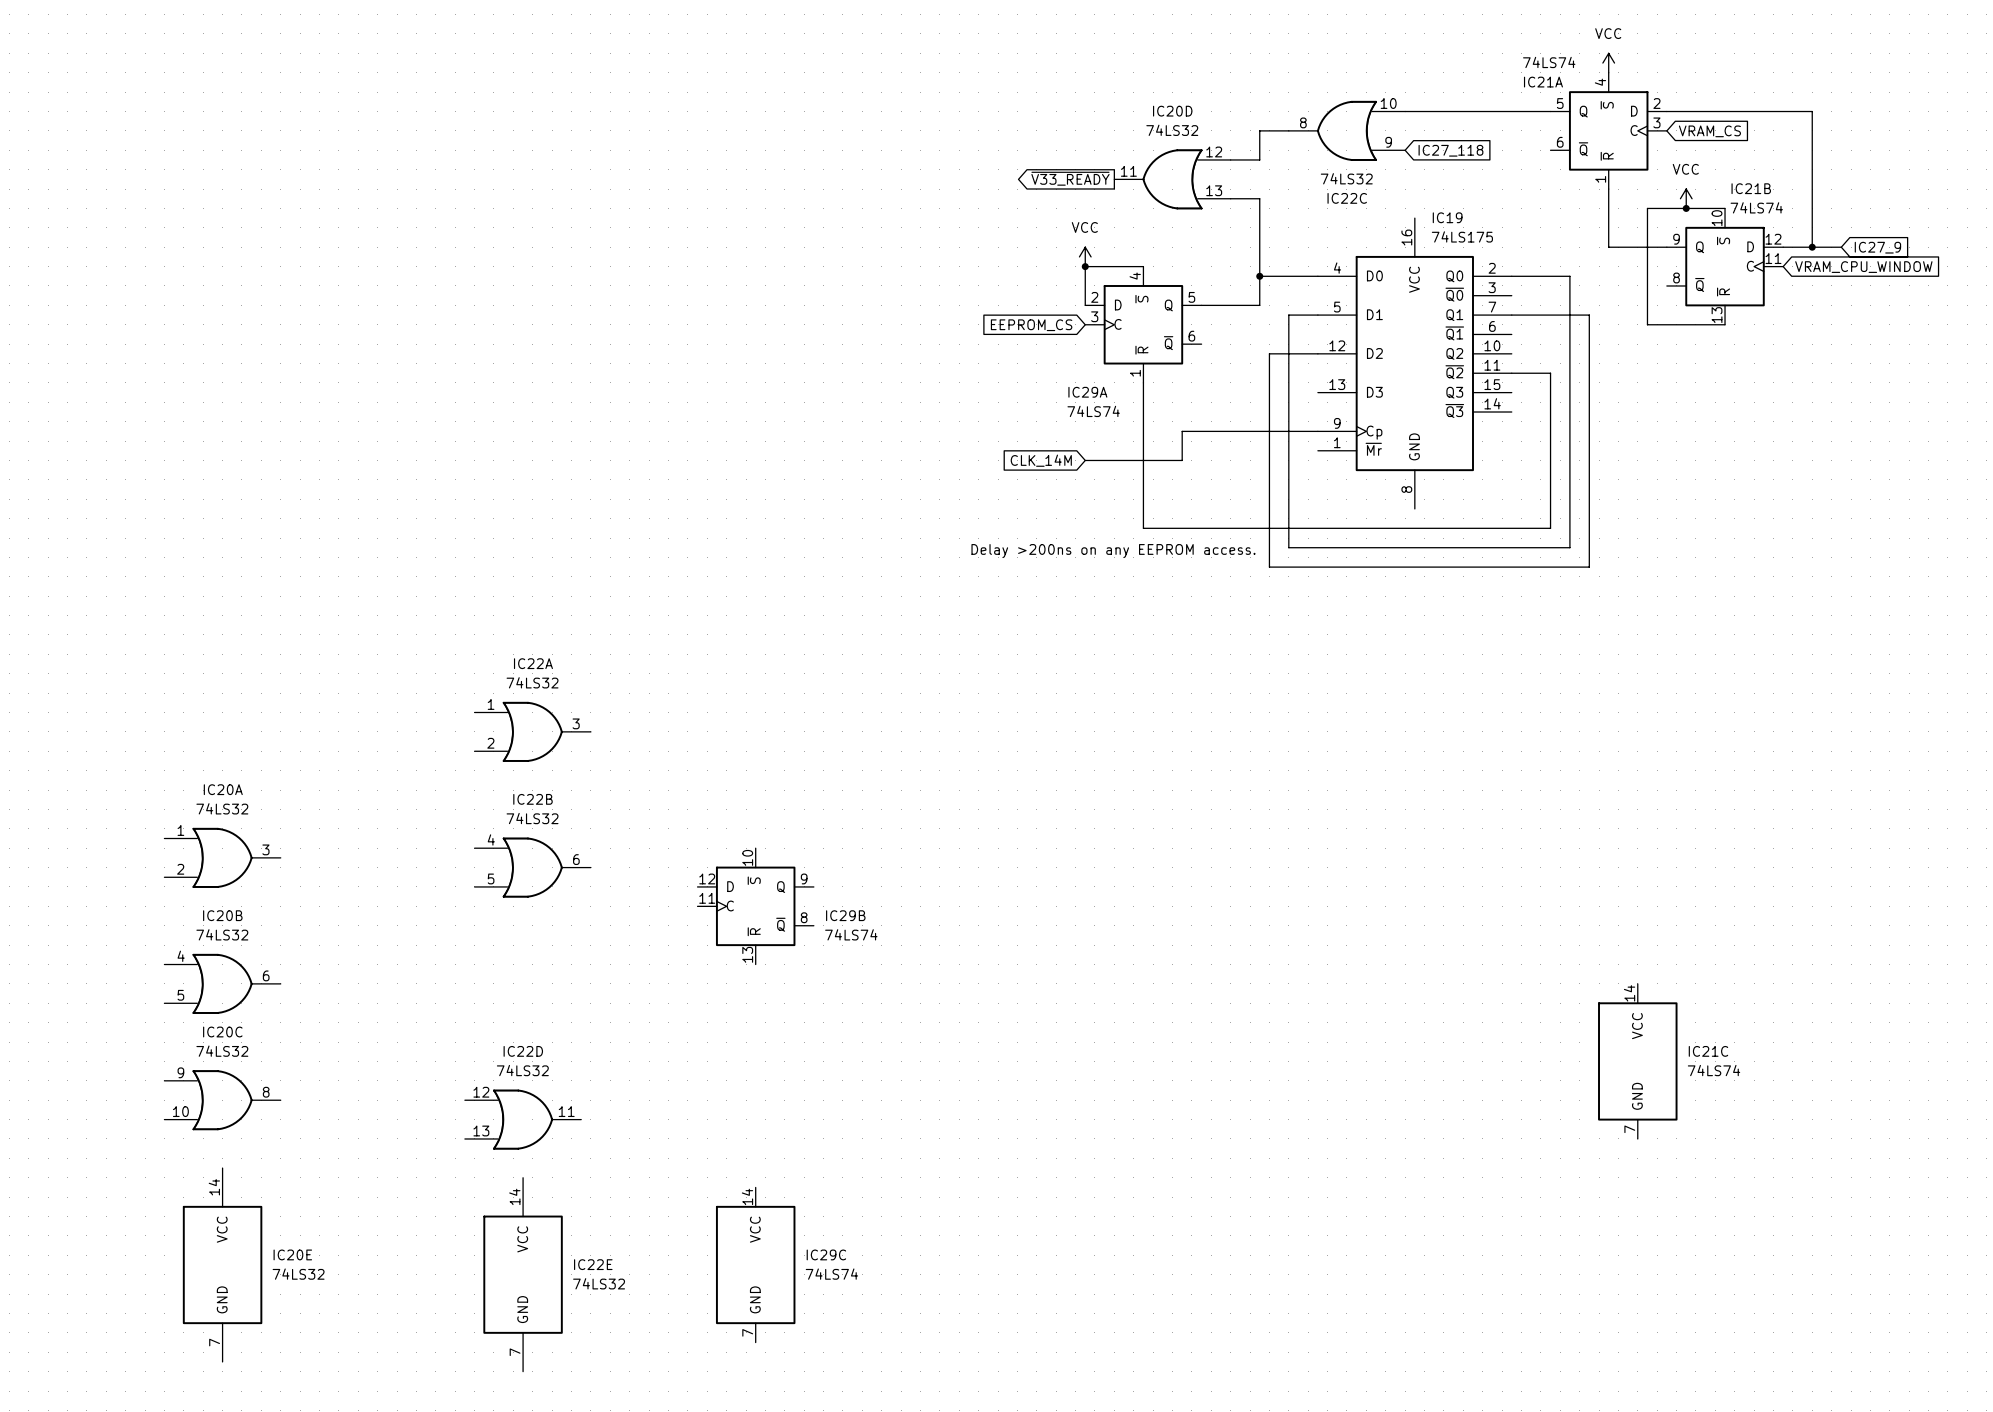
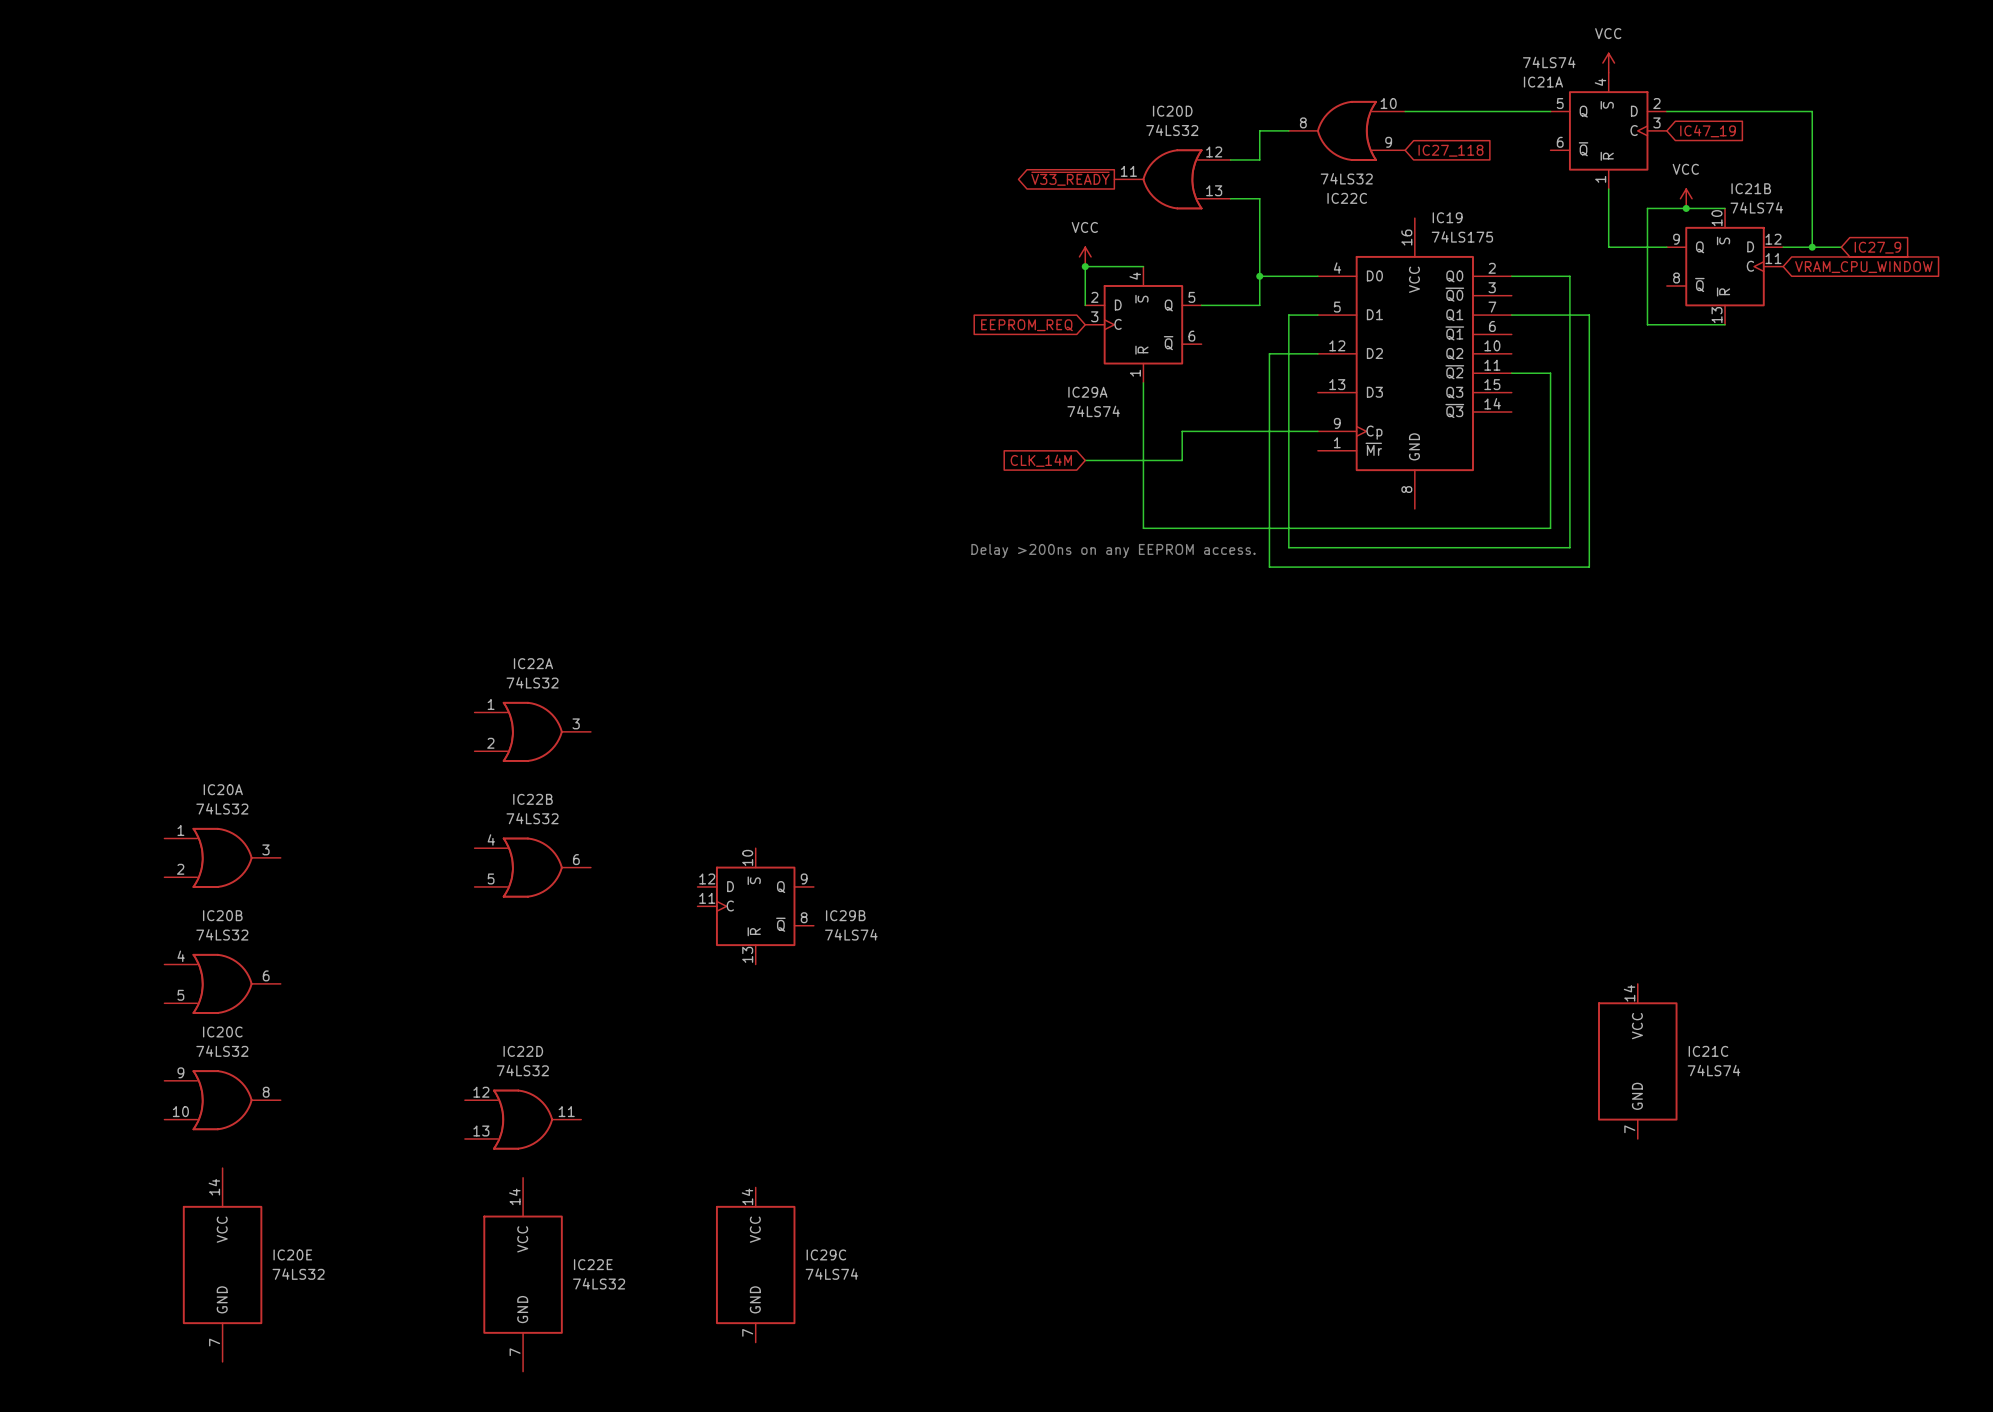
global label: VRAM_CS (1709, 131) -> IC47_19 (1708, 131)
global label: EEPROM_CS (1031, 325) -> EEPROM_REQ (1026, 325)

